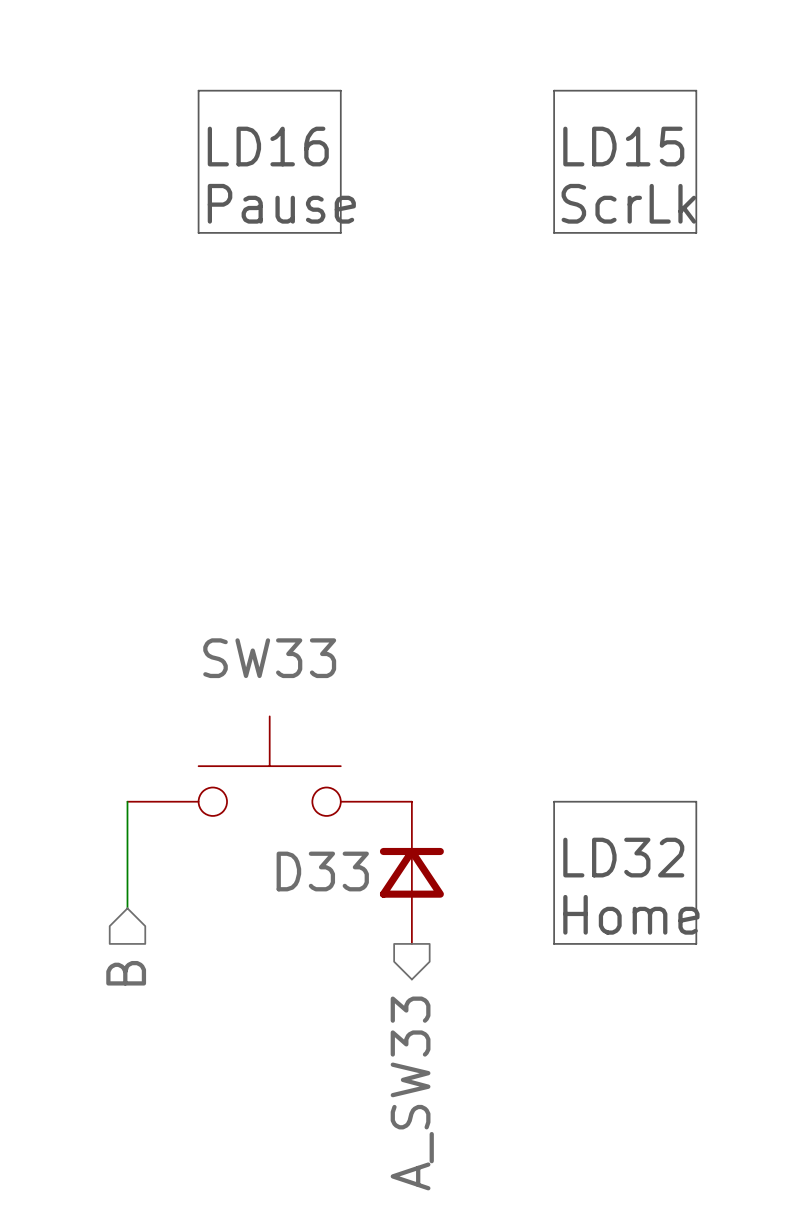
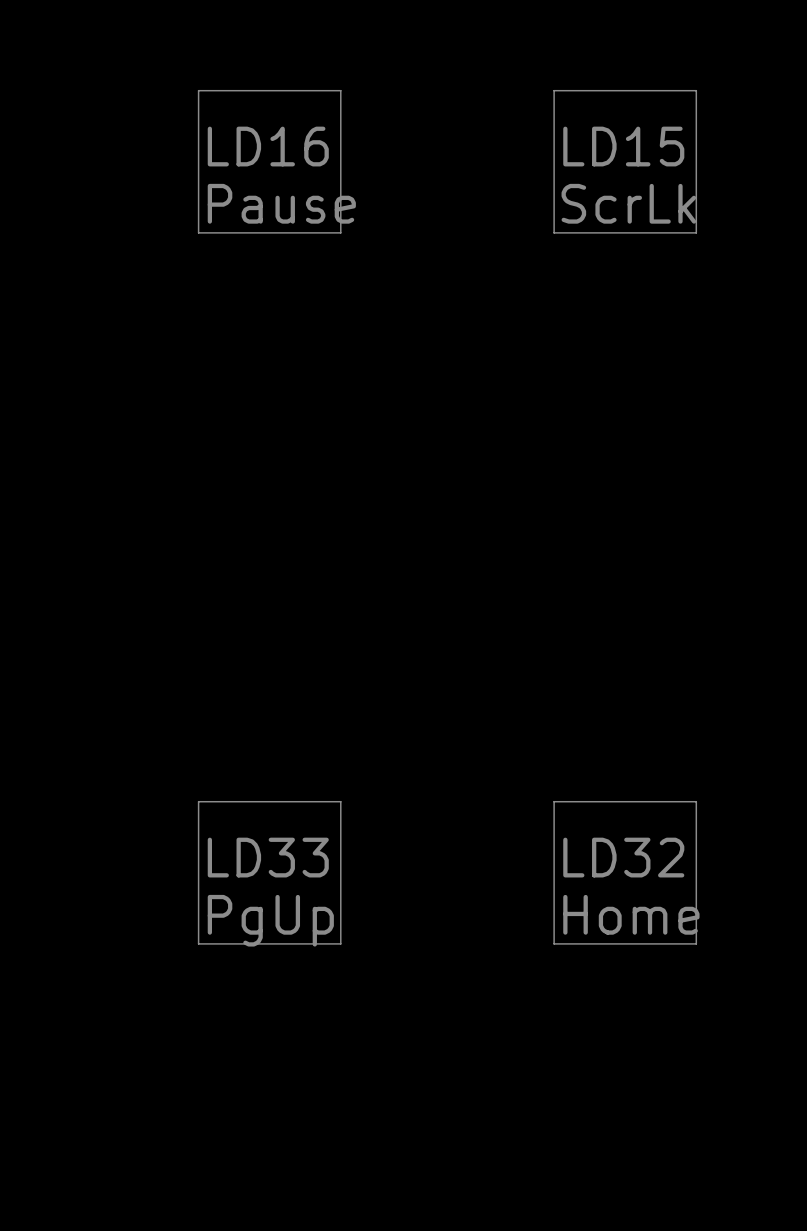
SW33: (269, 766) -> none
wire: (127, 801) (127, 908) -> none
line: none -> (198, 801) (340, 801) (340, 943) (198, 943) (198, 801)
text: none -> LD33 (268, 857)
D33: (411, 872) -> none
text: none -> PgUp (270, 920)
hierarchical label: B (126, 973) -> none
hierarchical label: A_SW33 (412, 1093) -> none

